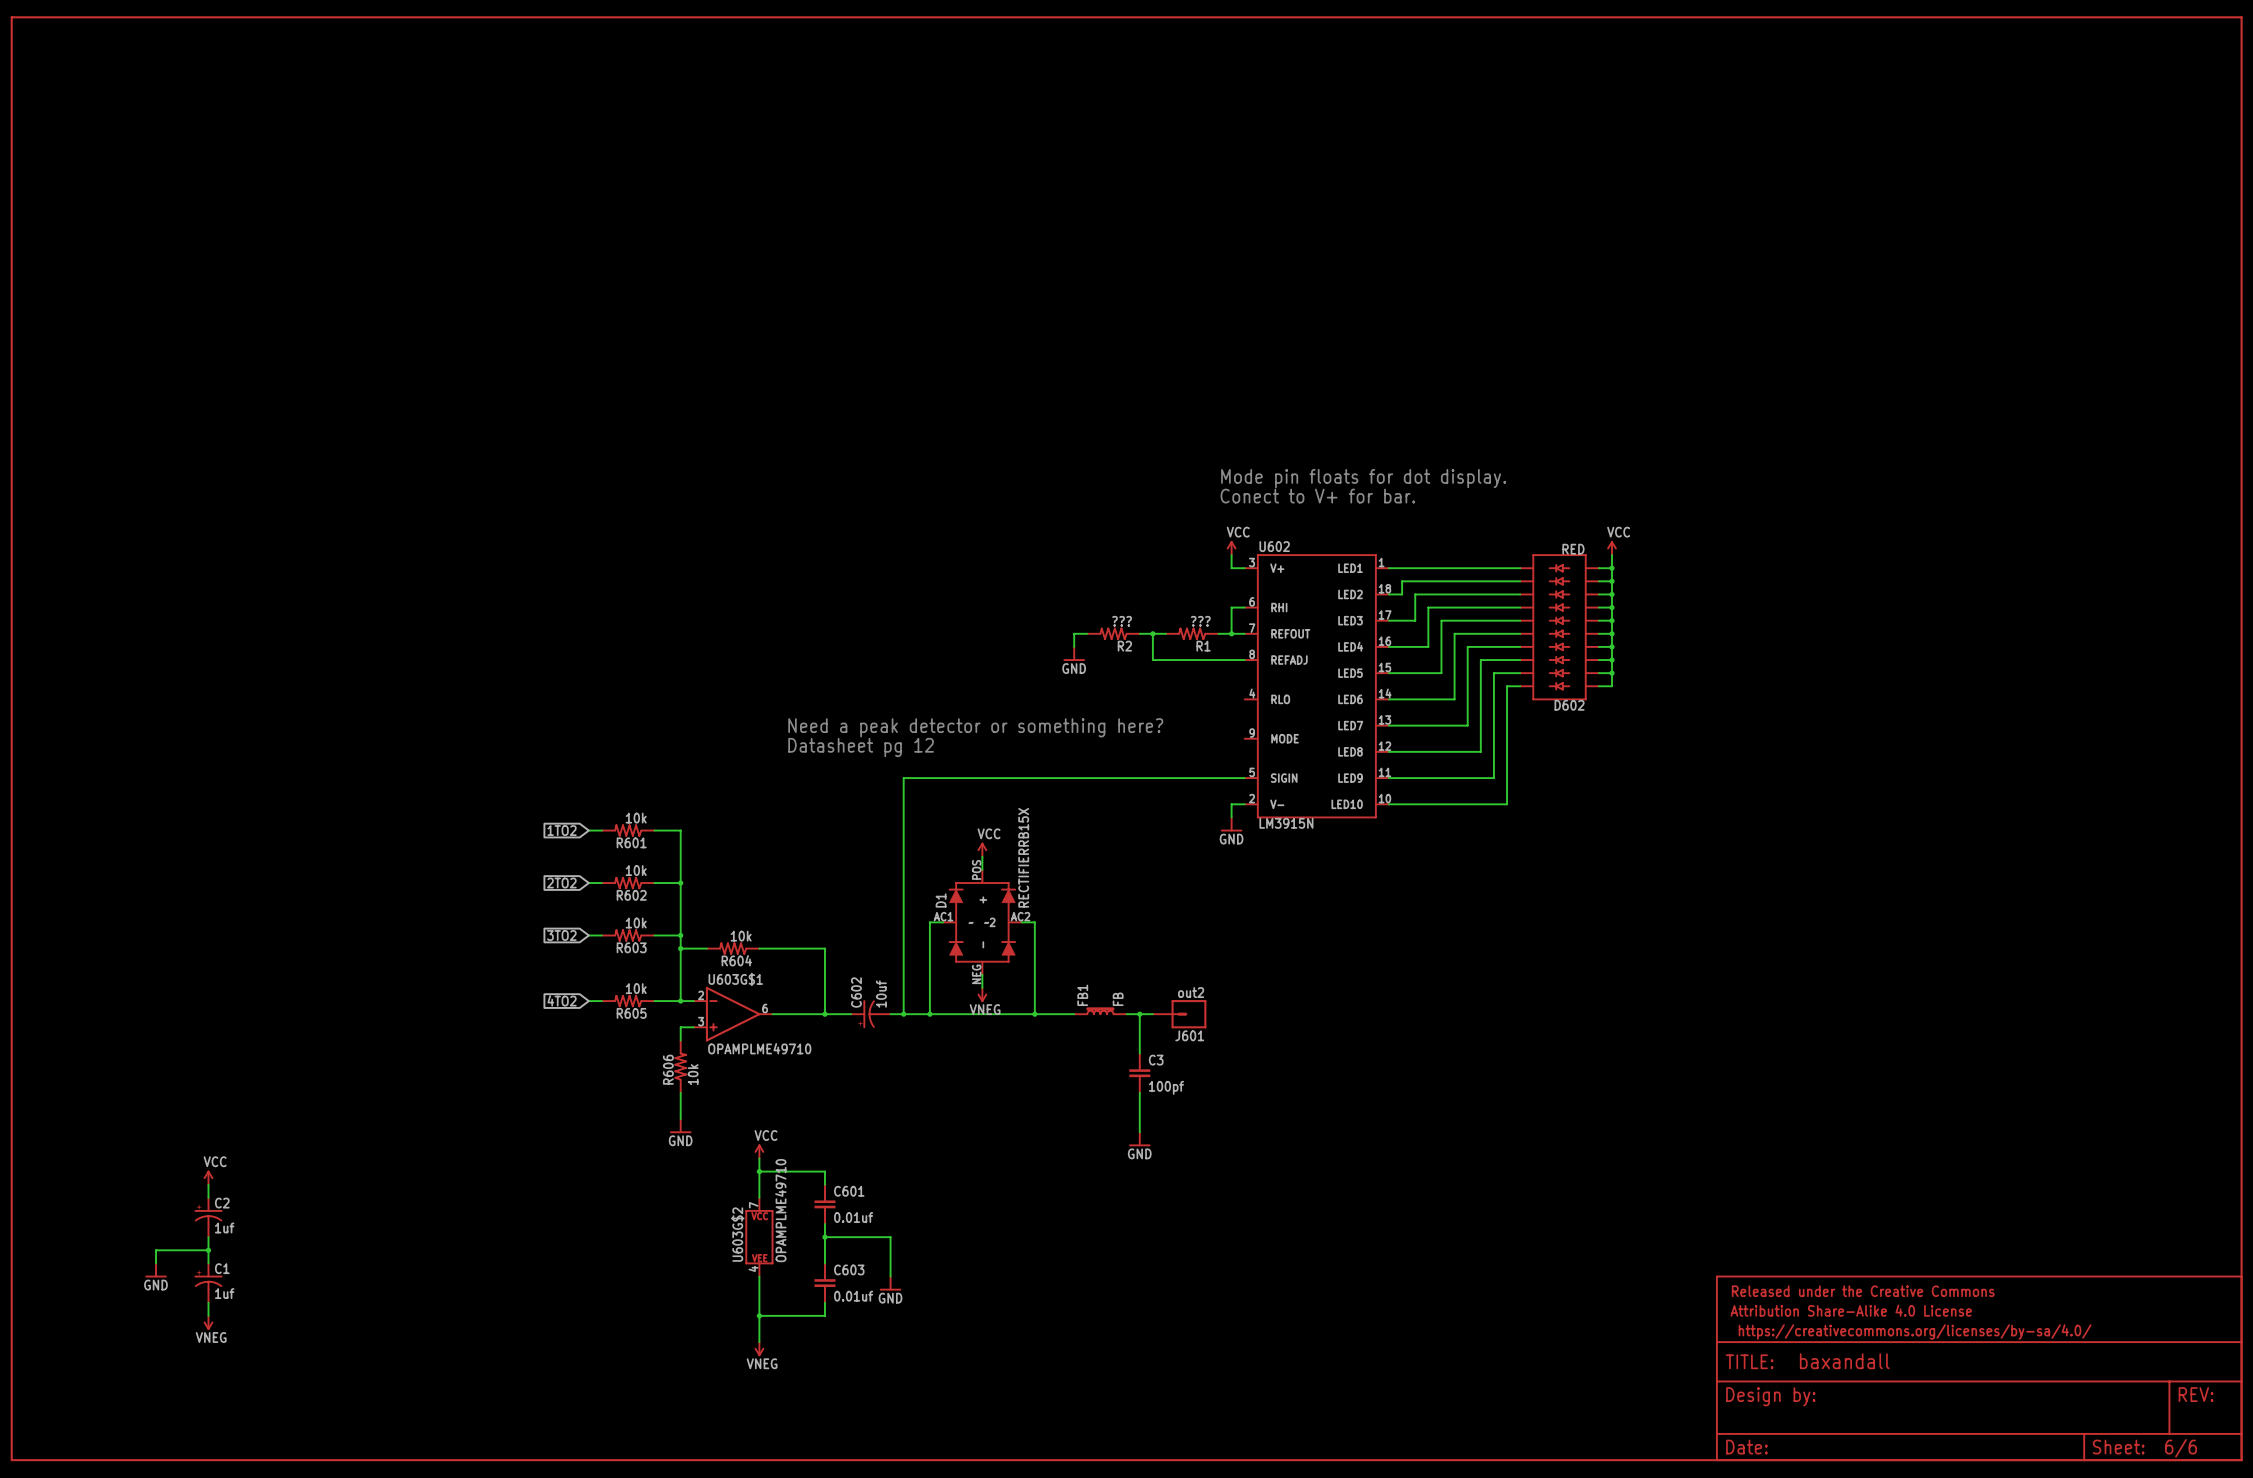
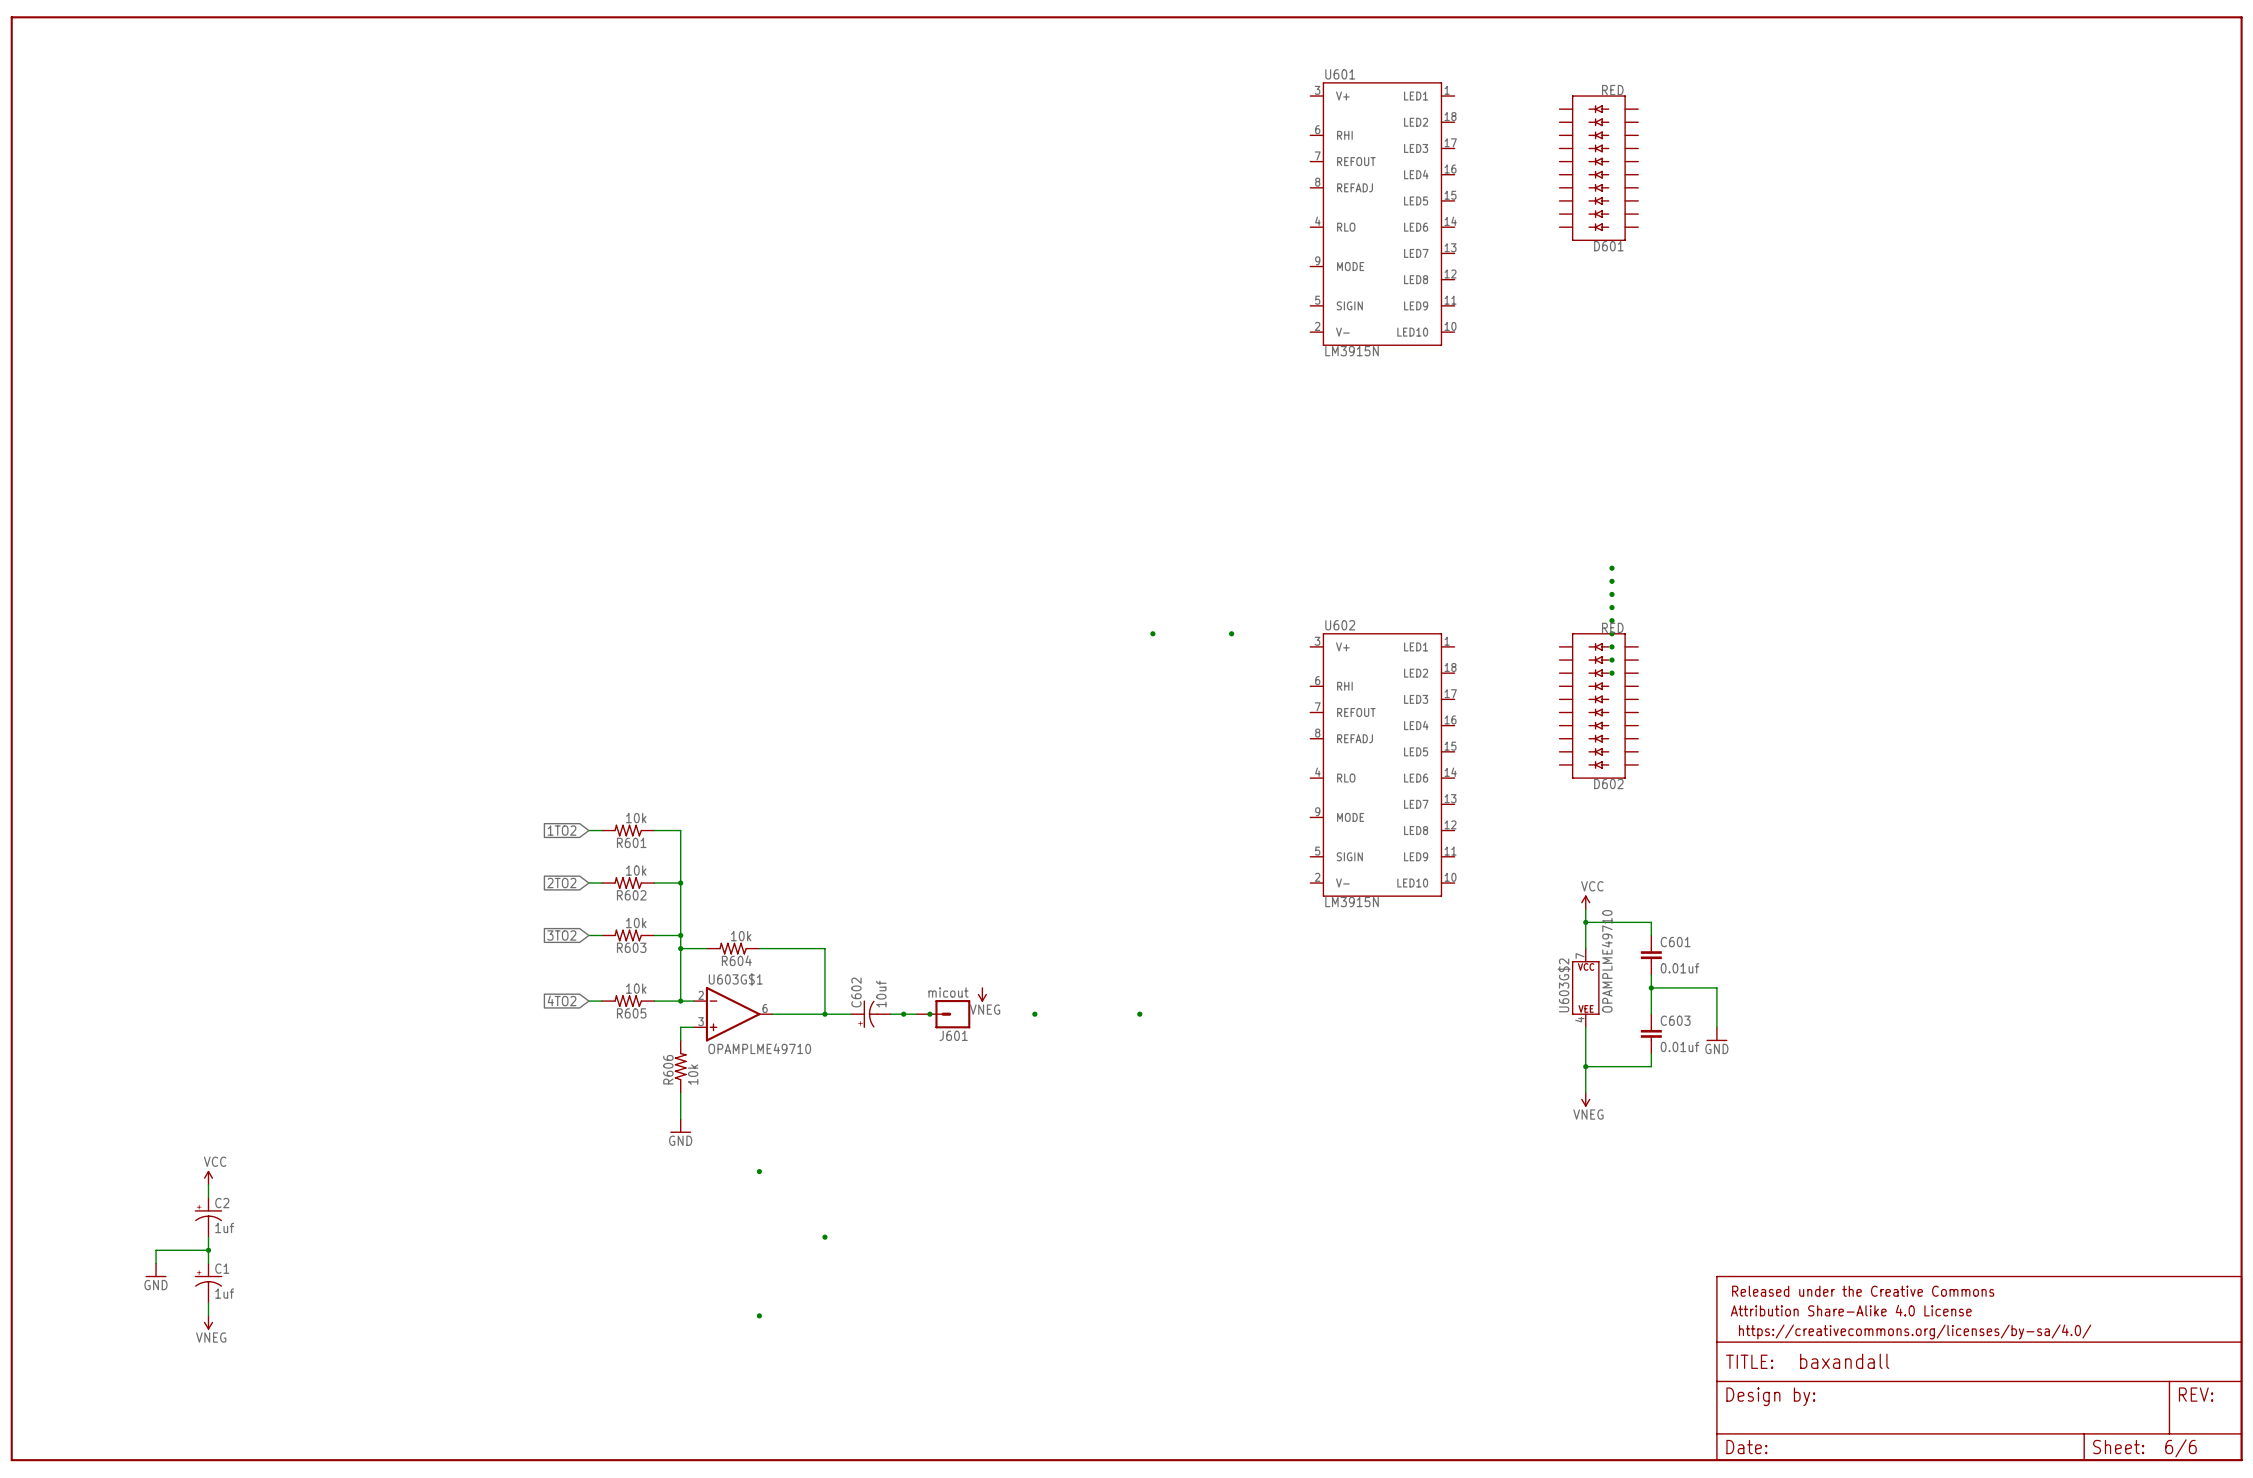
D601: none -> RED (1598, 168)
U601: none -> LM3915N (1382, 214)
text: Mode pin floats for dot display. (1363, 478) -> none
text: Conect to V+ for bar. (1317, 496) -> none
power symbol: VCC (1231, 548) -> none
power symbol: VCC (1611, 548) -> none
wire: (1231, 555) (1231, 568) (1244, 568) -> none
wire: (1611, 555) (1611, 686) (1598, 686) -> none
wire: (1389, 568) (1520, 568) -> none
wire: (1598, 568) (1611, 568) -> none
wire: (1520, 581) (1402, 581) (1402, 594) (1389, 594) -> none
wire: (1598, 581) (1611, 581) -> none
wire: (1520, 594) (1415, 594) (1415, 620) (1389, 620) -> none
wire: (1598, 594) (1611, 594) -> none
wire: (1244, 607) (1231, 607) (1231, 633) -> none
wire: (1520, 607) (1428, 607) (1428, 646) (1389, 646) -> none
wire: (1598, 607) (1611, 607) -> none
wire: (1520, 620) (1441, 620) (1441, 673) (1389, 673) -> none
wire: (1598, 620) (1611, 620) -> none
D602 position: (1559, 627) -> (1598, 705)
wire: (1087, 633) (1074, 633) (1074, 646) -> none
R2: ??? (1113, 633) -> none
wire: (1139, 633) (1166, 633) -> none
wire: (1152, 633) (1152, 660) (1244, 660) -> none
R1: ??? (1192, 633) -> none
wire: (1218, 633) (1244, 633) -> none
wire: (1520, 633) (1454, 633) (1454, 699) (1389, 699) -> none
wire: (1520, 646) (1467, 646) (1467, 725) (1389, 725) -> none
power symbol: GND (1074, 653) -> none
wire: (1520, 660) (1480, 660) (1480, 751) (1389, 751) -> none
wire: (1520, 673) (1493, 673) (1493, 778) (1389, 778) -> none
U602 position: (1316, 686) -> (1382, 764)
wire: (1520, 686) (1507, 686) (1507, 804) (1389, 804) -> none
text: Need a peak detector or something here? (975, 727) -> none
text: Datasheet pg 12 (861, 747) -> none
wire: (1244, 778) (903, 778) (903, 1014) -> none
wire: (1244, 804) (1231, 804) (1231, 817) -> none
power symbol: GND (1231, 824) -> none
power symbol: VCC (982, 849) -> none
wire: (982, 856) (982, 869) -> none
power symbol: none -> VCC (1585, 902)
wire: none -> (1585, 909) (1585, 948)
wire: (943, 922) (929, 922) (929, 1014) -> none
D1: RECTIFIERRB15X (982, 922) -> none
wire: (1021, 922) (1034, 922) (1034, 1014) -> none
wire: none -> (1585, 922) (1651, 922) (1651, 935)
junction: none -> (1585, 922)
wire: (982, 974) (982, 987) -> none
wire: none -> (1651, 974) (1651, 1014)
wire: none -> (1651, 987) (1716, 987) (1716, 1027)
junction: none -> (1651, 987)
J601 value: out2 (1191, 992) -> micout (948, 992)
FB1: FB (1100, 1011) -> none
wire: (916, 1014) (1074, 1014) -> none
wire: (1126, 1014) (1152, 1014) -> none
wire: (1139, 1014) (1139, 1053) -> none
J601 position: (1179, 1014) -> (943, 1014)
wire: none -> (1585, 1027) (1585, 1092)
power symbol: none -> GND (1716, 1034)
wire: none -> (1651, 1053) (1651, 1066) (1585, 1066)
junction: none -> (1585, 1066)
C3: 100pf (1139, 1073) -> none
wire: (1139, 1092) (1139, 1132) -> none
power symbol: none -> VNEG (1585, 1099)
power symbol: GND (1139, 1139) -> none
power symbol: VCC (759, 1151) -> none
wire: (759, 1158) (759, 1197) -> none
wire: (759, 1171) (824, 1171) (824, 1184) -> none
C601 position: (824, 1204) -> (1651, 955)
wire: (824, 1224) (824, 1263) -> none
U603G$2 position: (759, 1237) -> (1585, 987)
wire: (824, 1237) (890, 1237) (890, 1276) -> none
wire: (759, 1276) (759, 1342) -> none
C603 position: (824, 1283) -> (1651, 1033)
power symbol: GND (890, 1283) -> none
wire: (824, 1302) (824, 1315) (759, 1315) -> none
power symbol: VNEG (759, 1348) -> none

